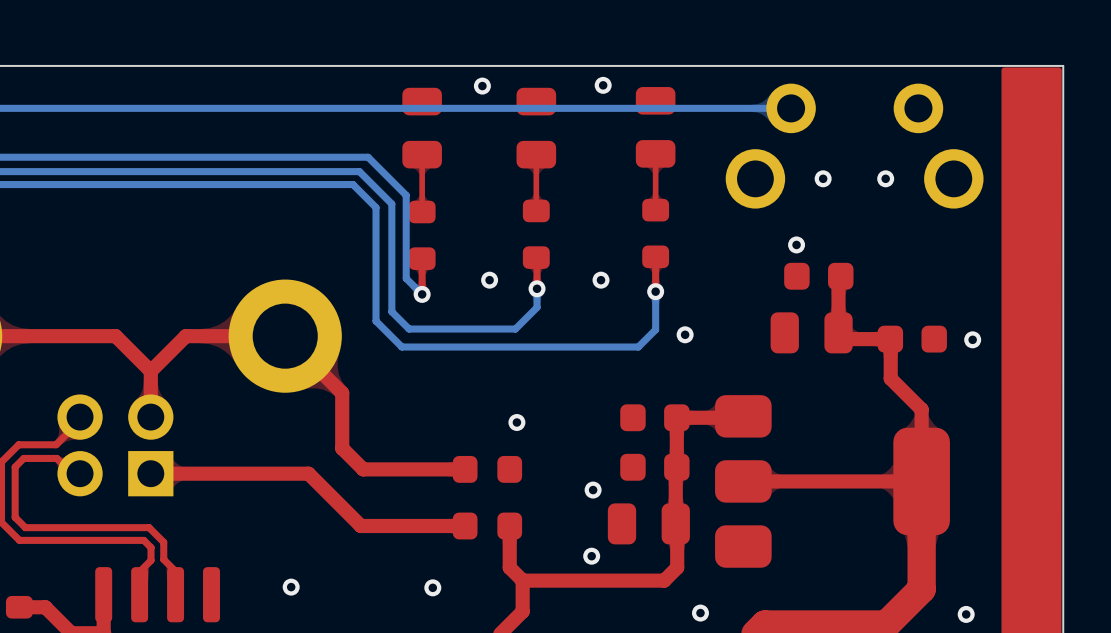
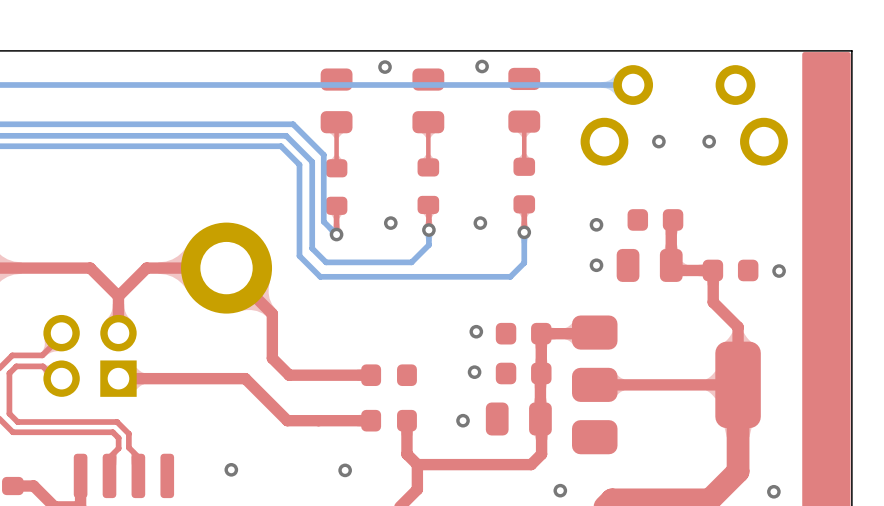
via: (796, 244) -> none
via: none -> (596, 224)
via: none -> (596, 265)
via: (685, 334) -> none
via: none -> (476, 331)
via: (516, 422) -> none
via: none -> (474, 372)
via: (593, 490) -> none
via: none -> (463, 420)
via: (591, 556) -> none

